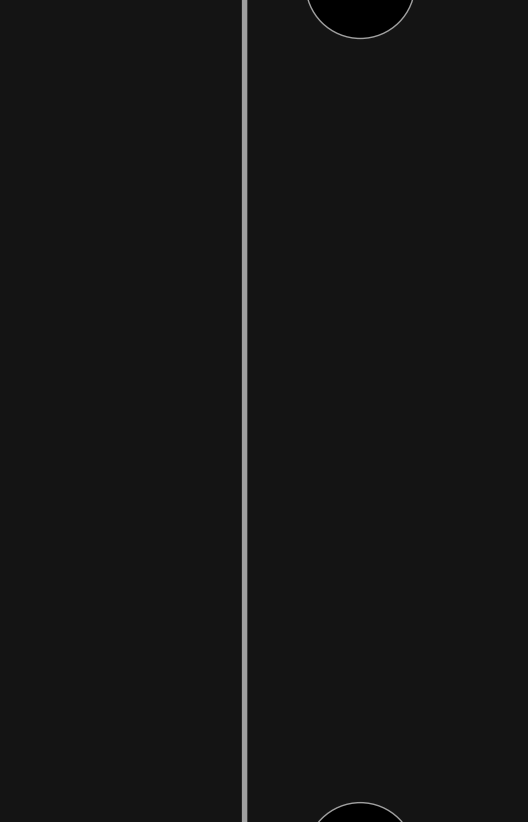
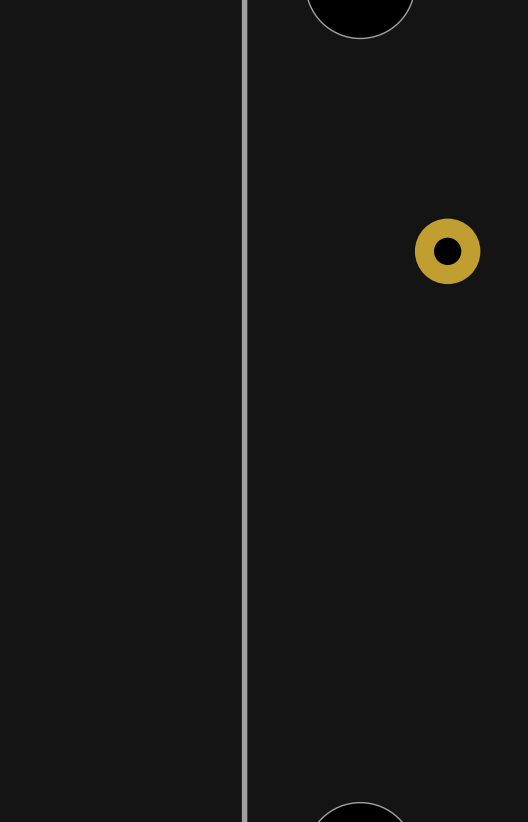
via: none -> (447, 251)

